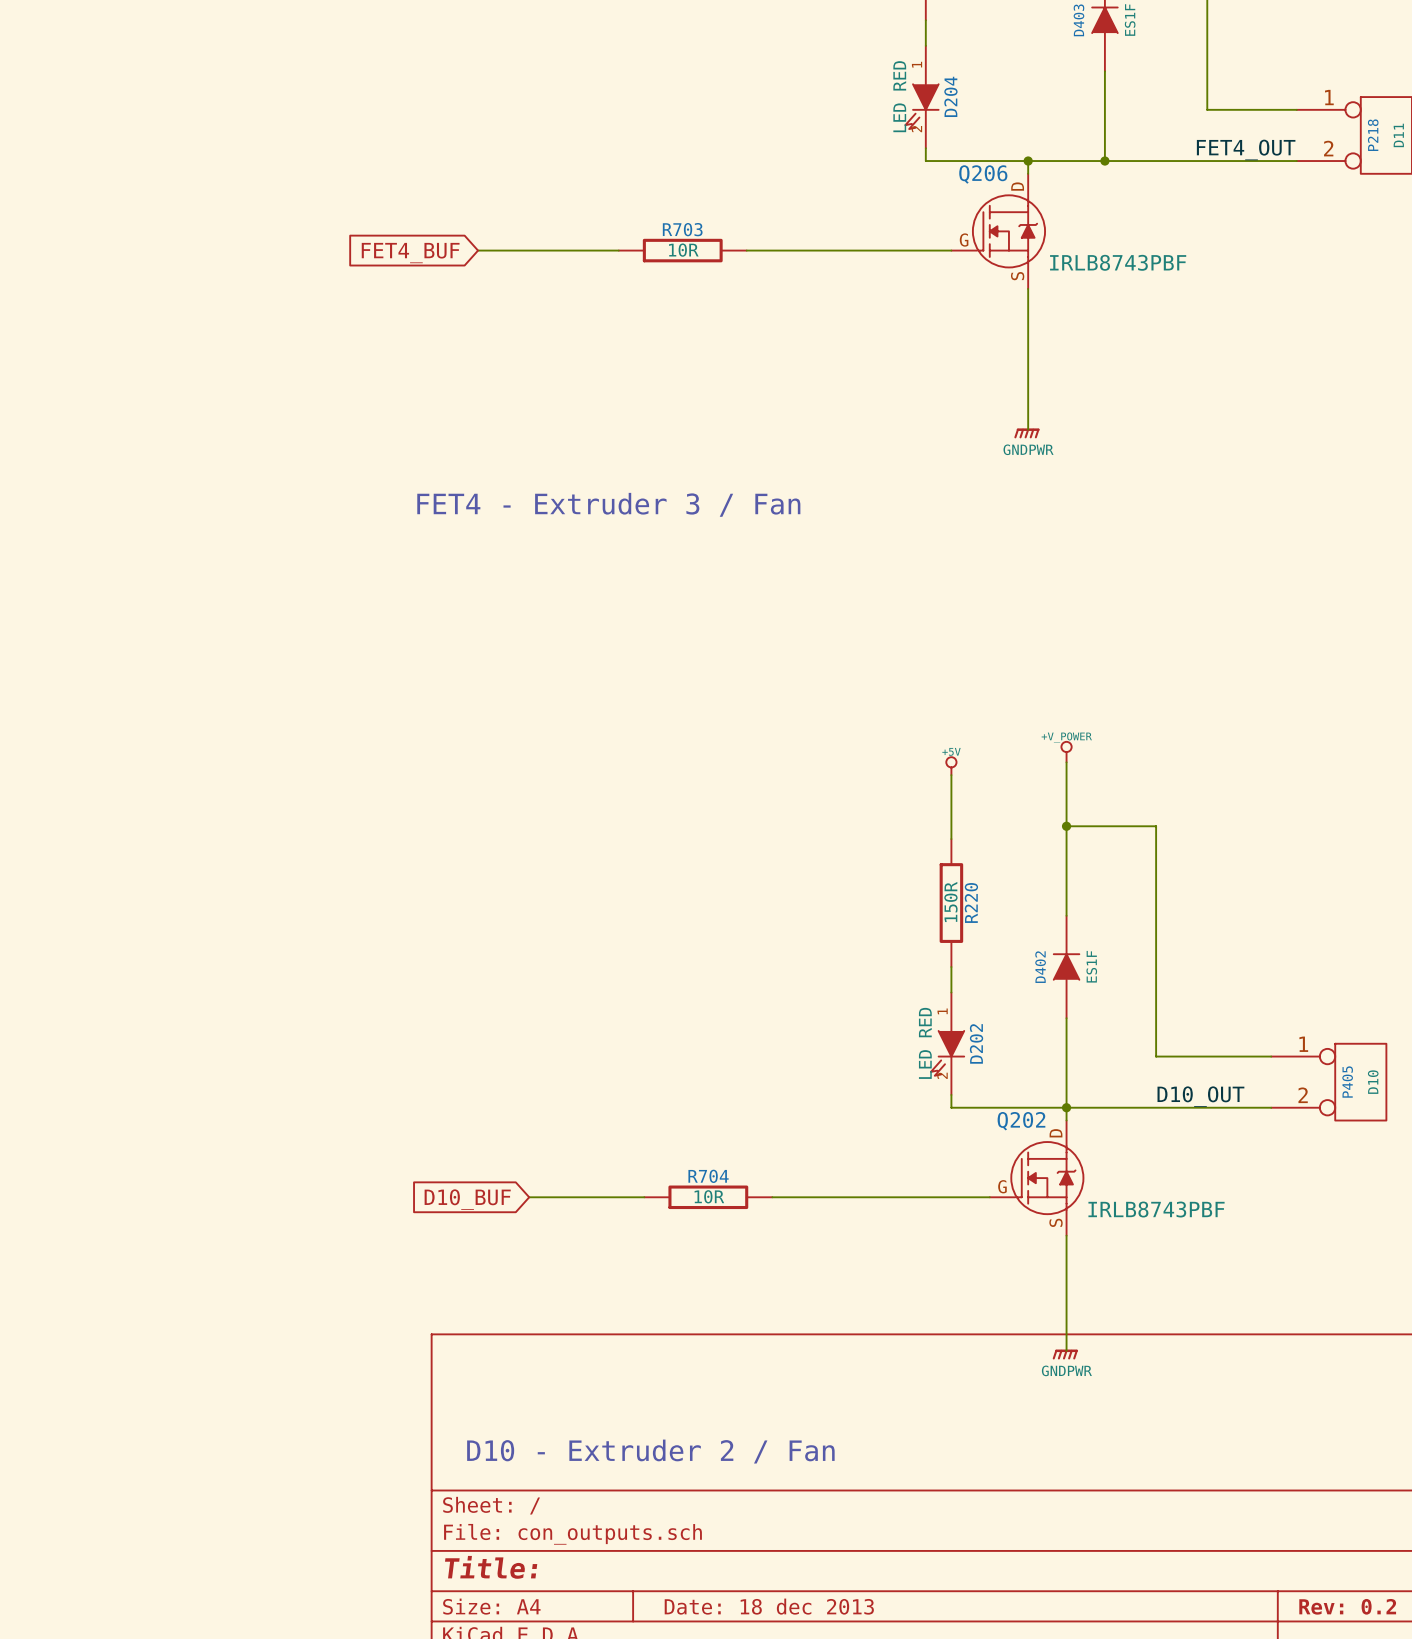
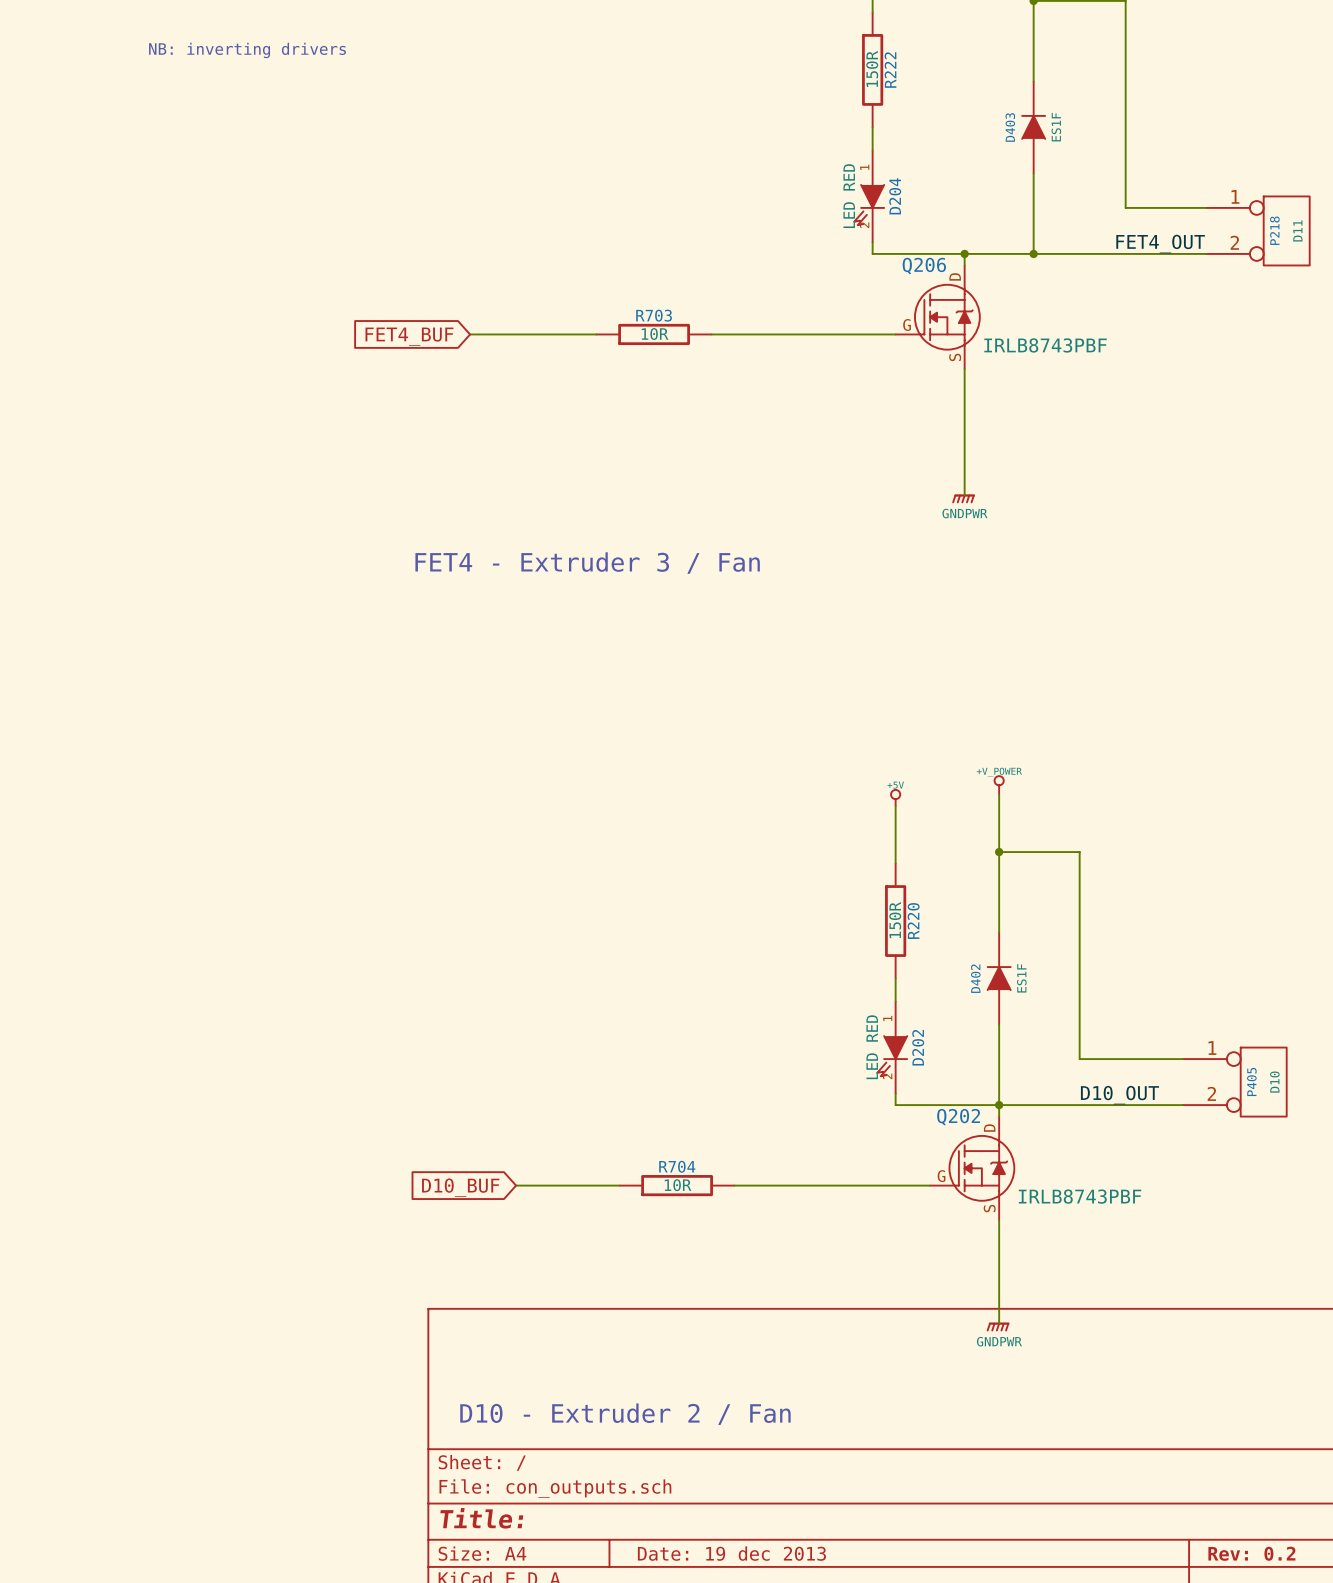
title block: Date: 18 dec 2013 (769, 1606) -> Date: 19 dec 2013 (731, 1553)

